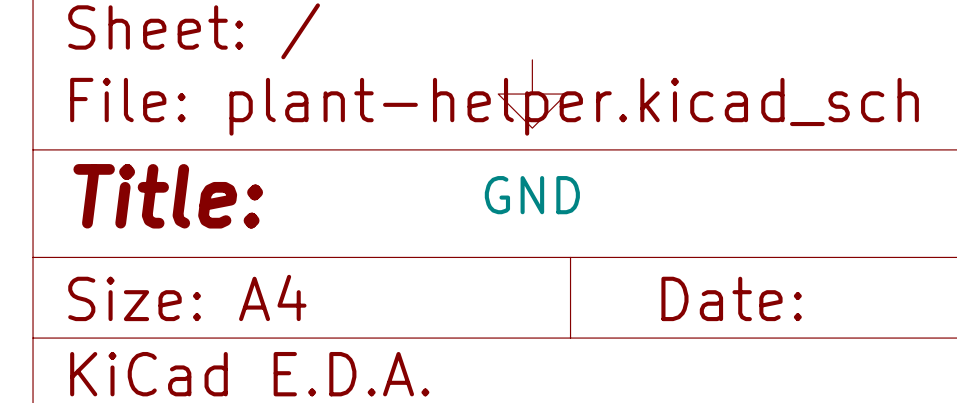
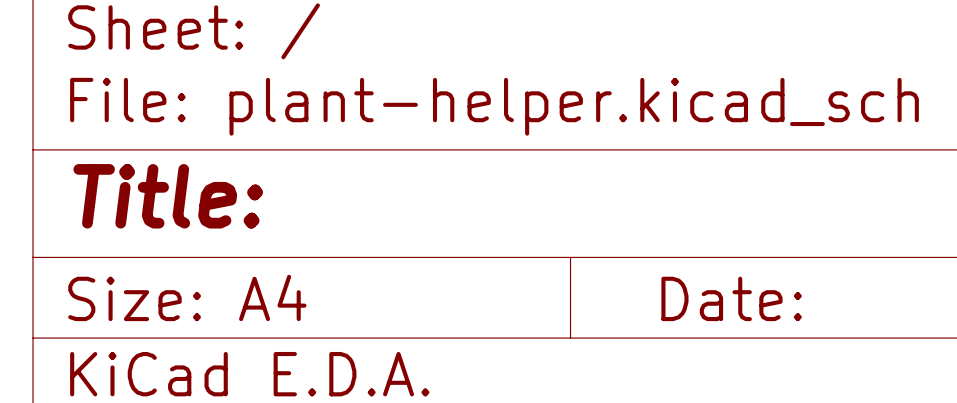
power symbol: GND (532, 94) -> none

